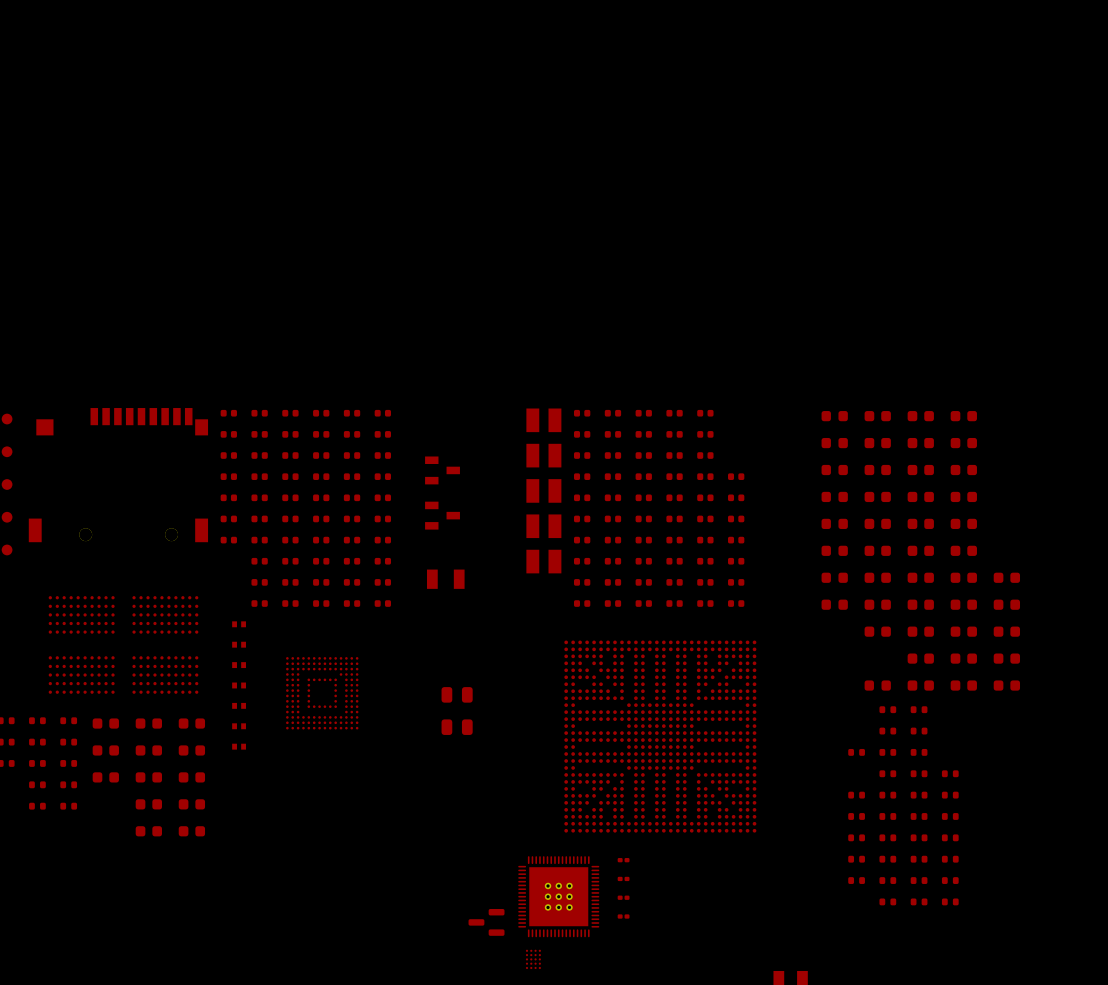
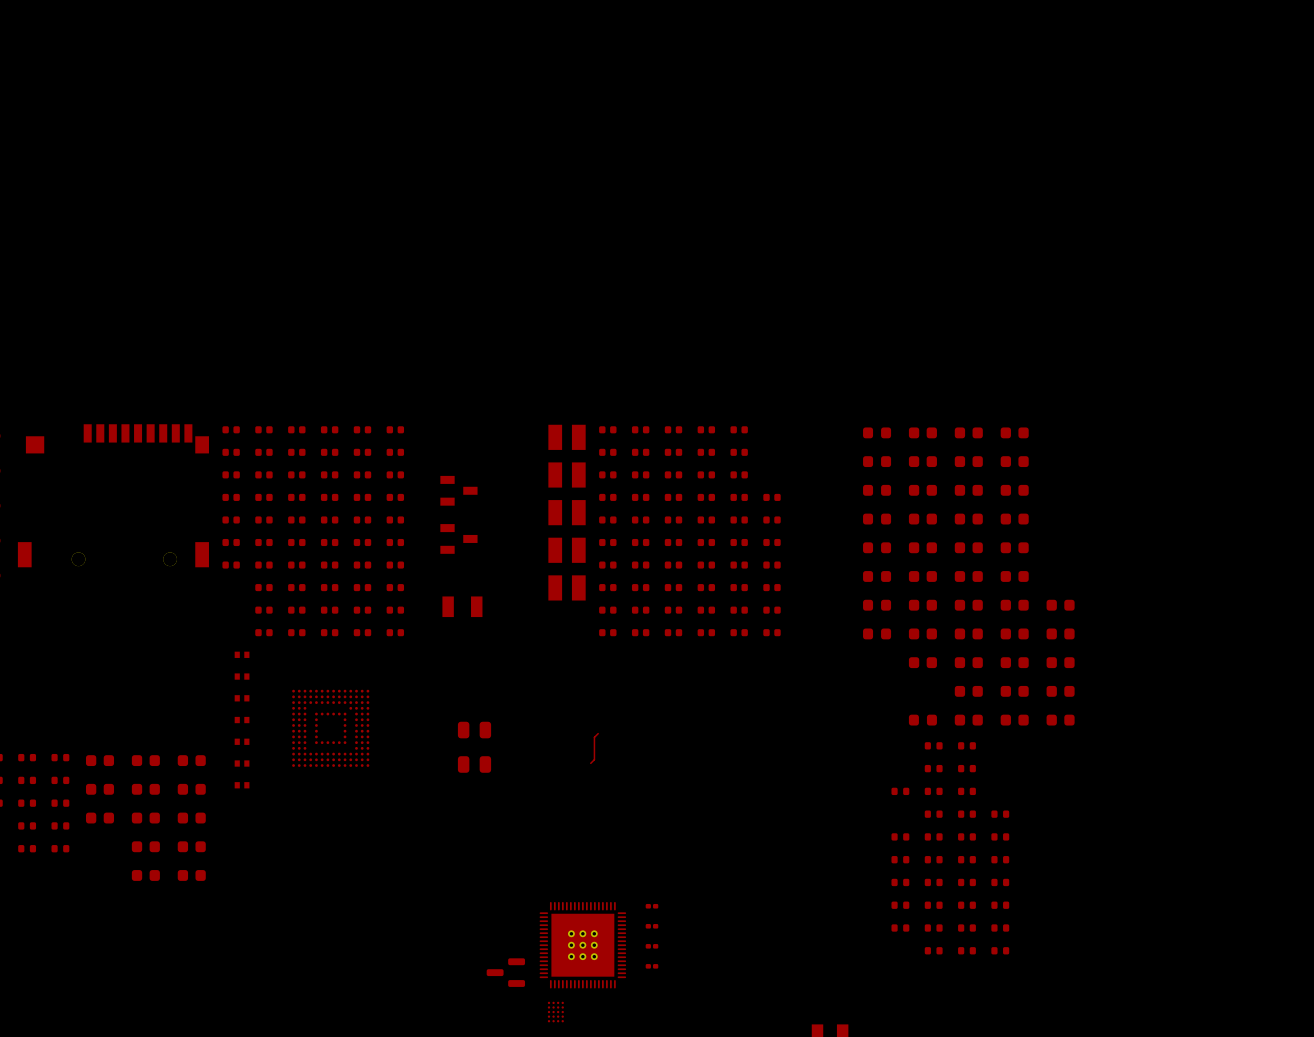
part: (123, 644) -> none
top track: none -> (598, 733) (594, 737) (594, 759) (590, 763)
part: (660, 736) -> none

